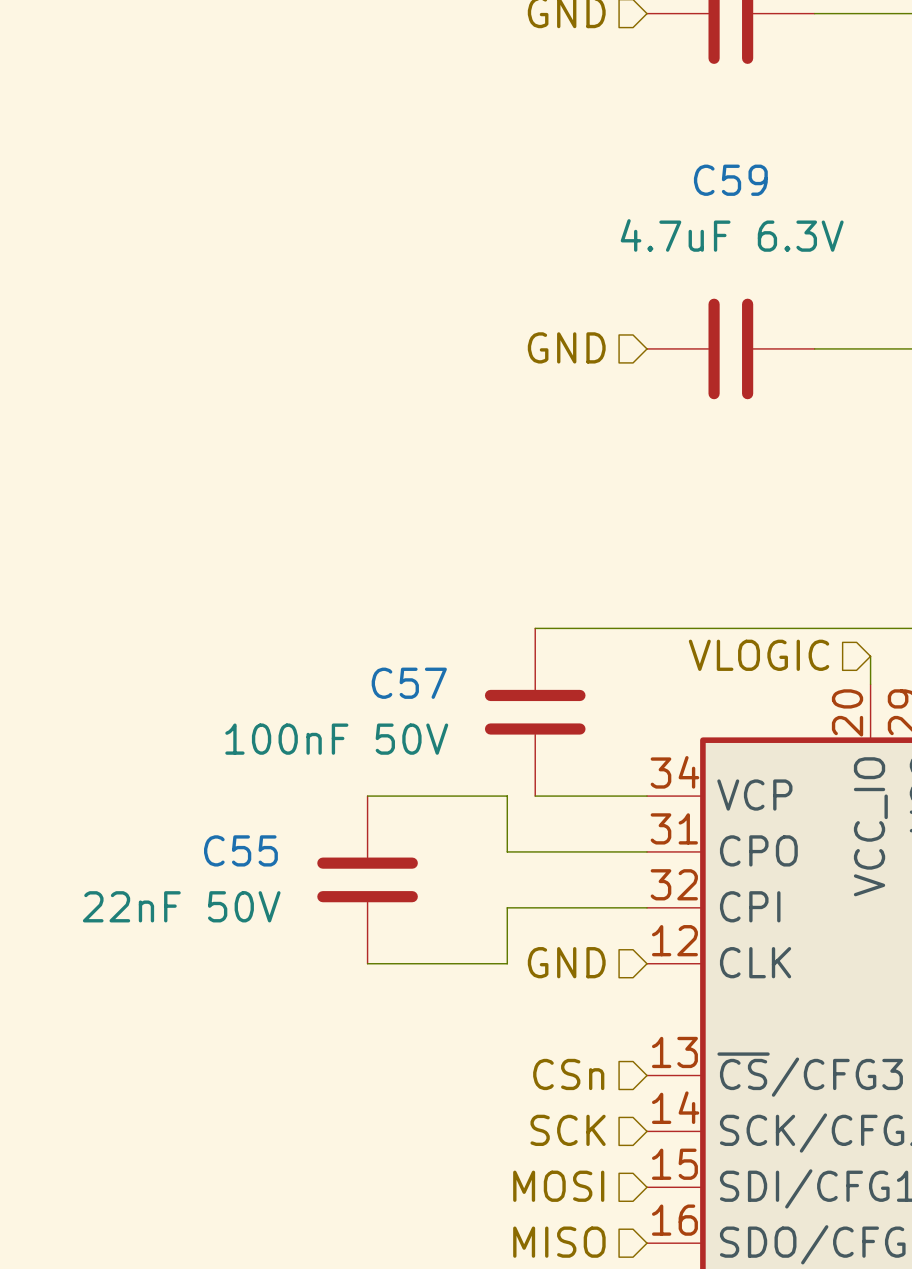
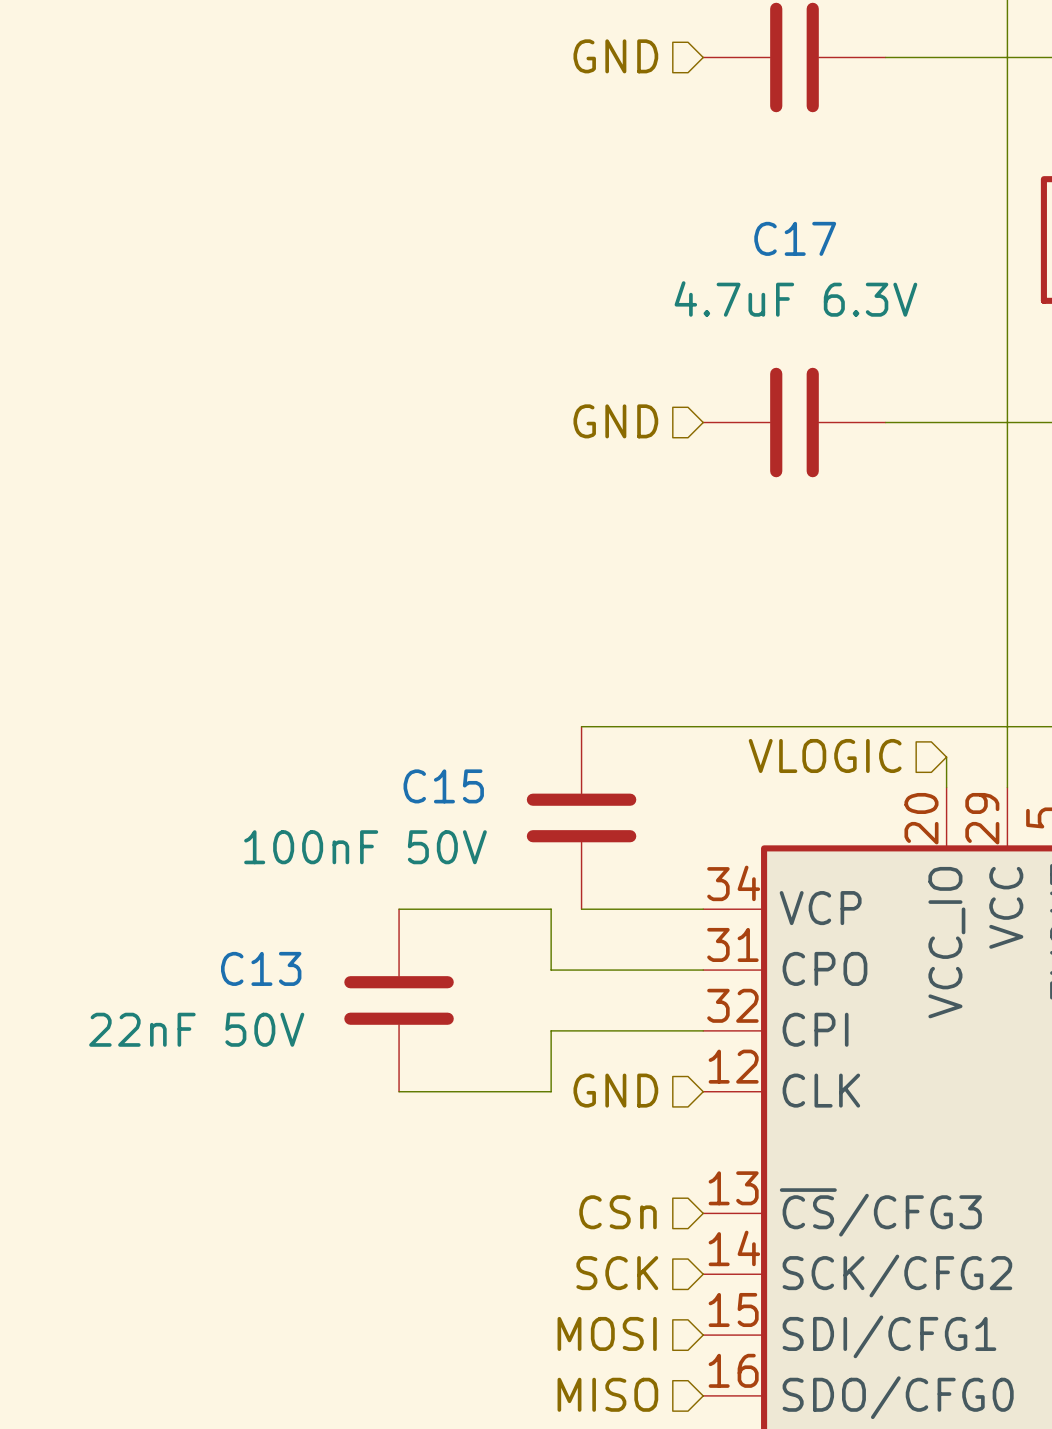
C59 name: C59 (730, 180) -> C17 (795, 238)
C57 name: C57 (409, 683) -> C15 (443, 786)
C55 name: C55 (240, 850) -> C13 (261, 968)

